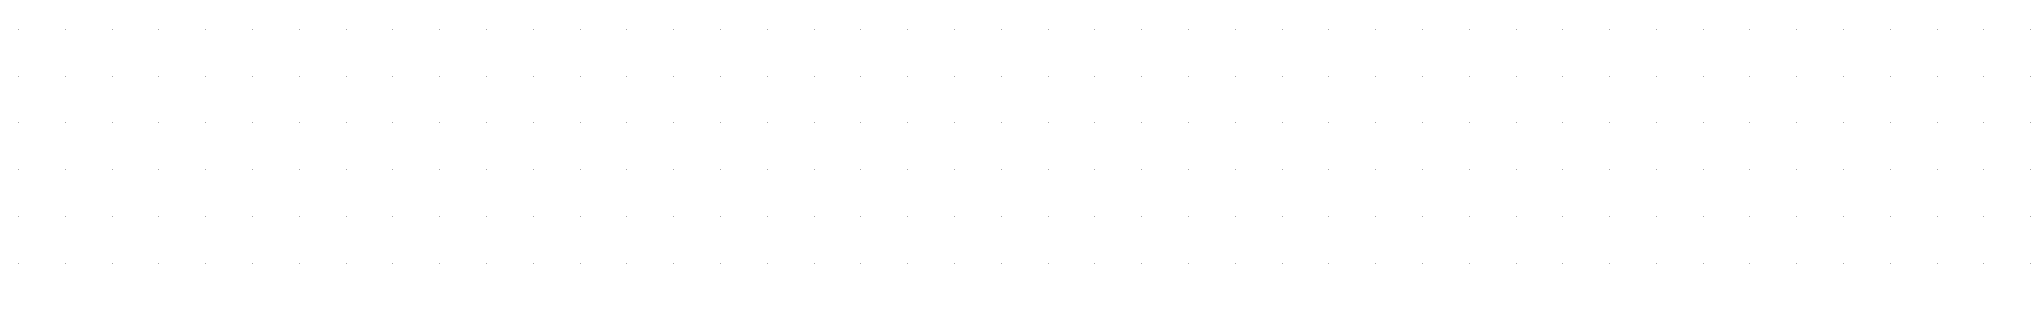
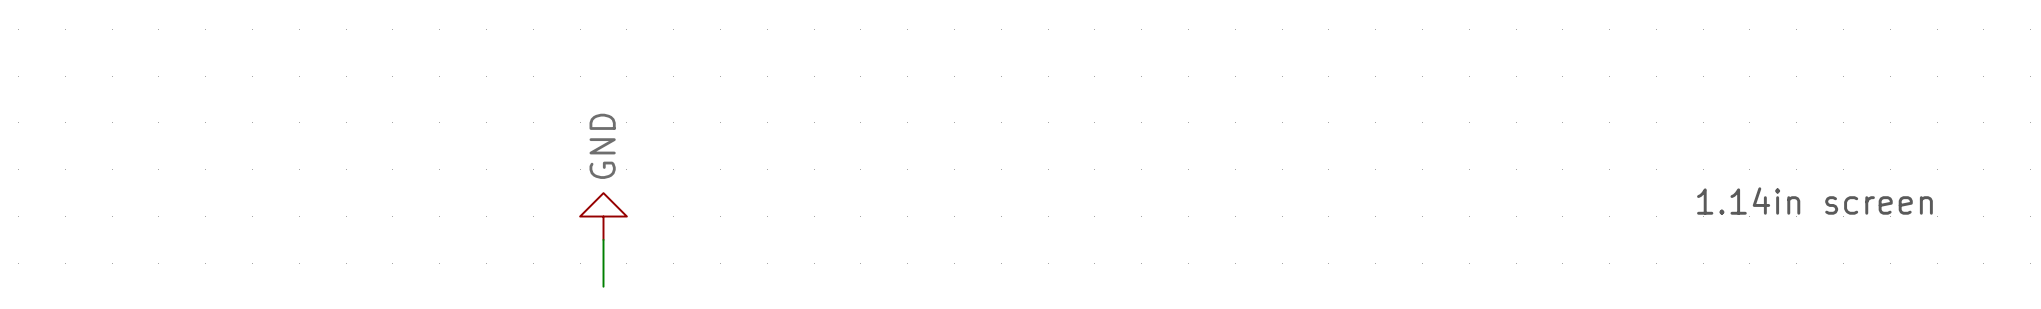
text: none -> 1.14in screen (1814, 201)
power symbol: none -> GND (603, 216)
wire: none -> (603, 239) (603, 286)

